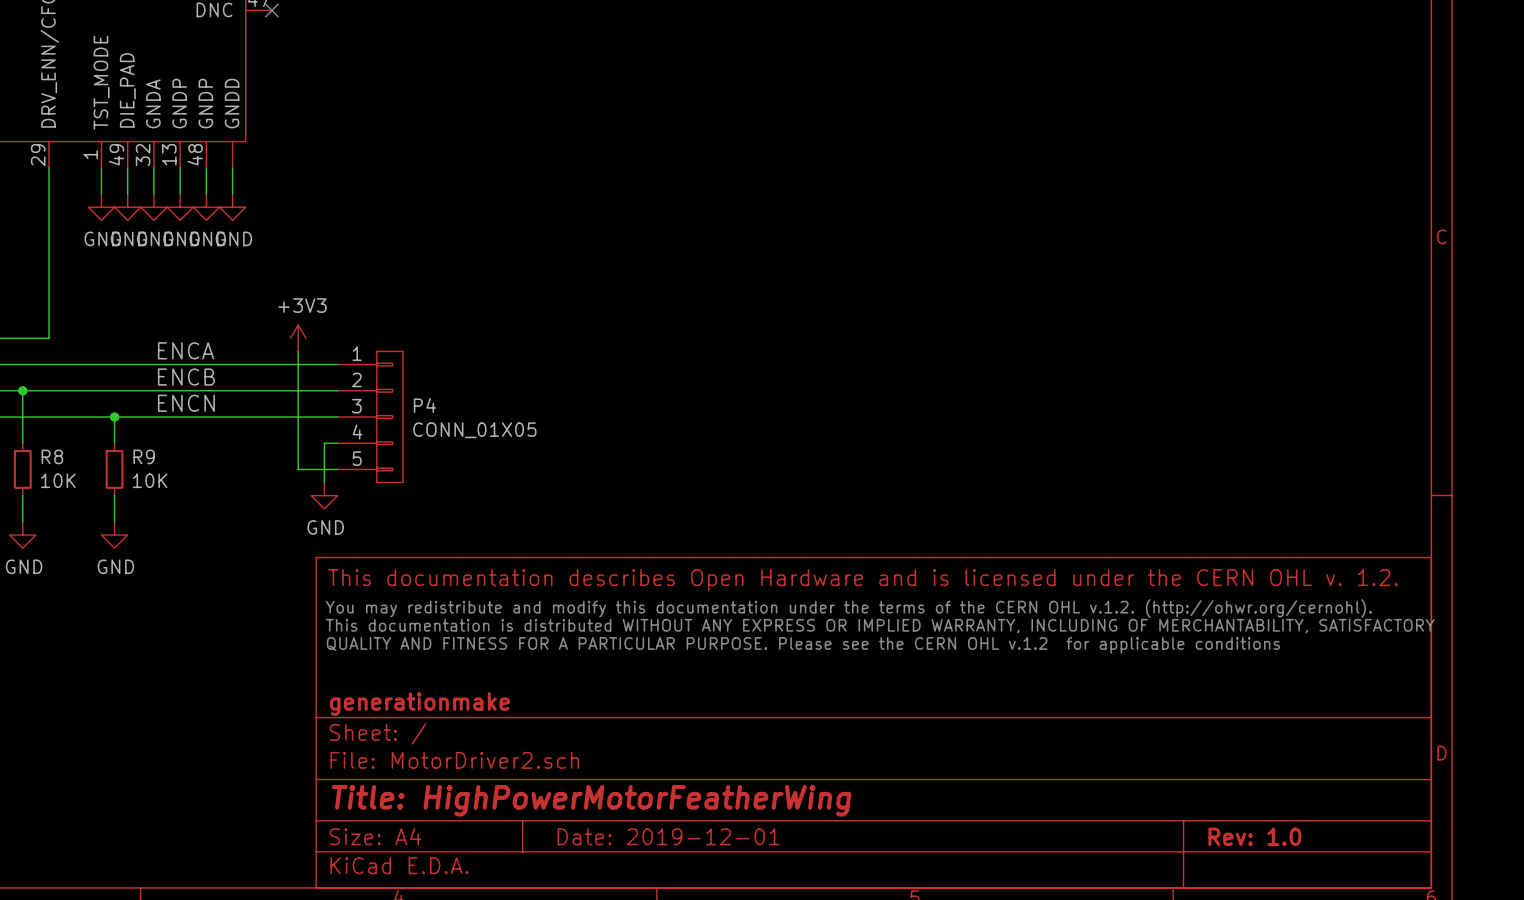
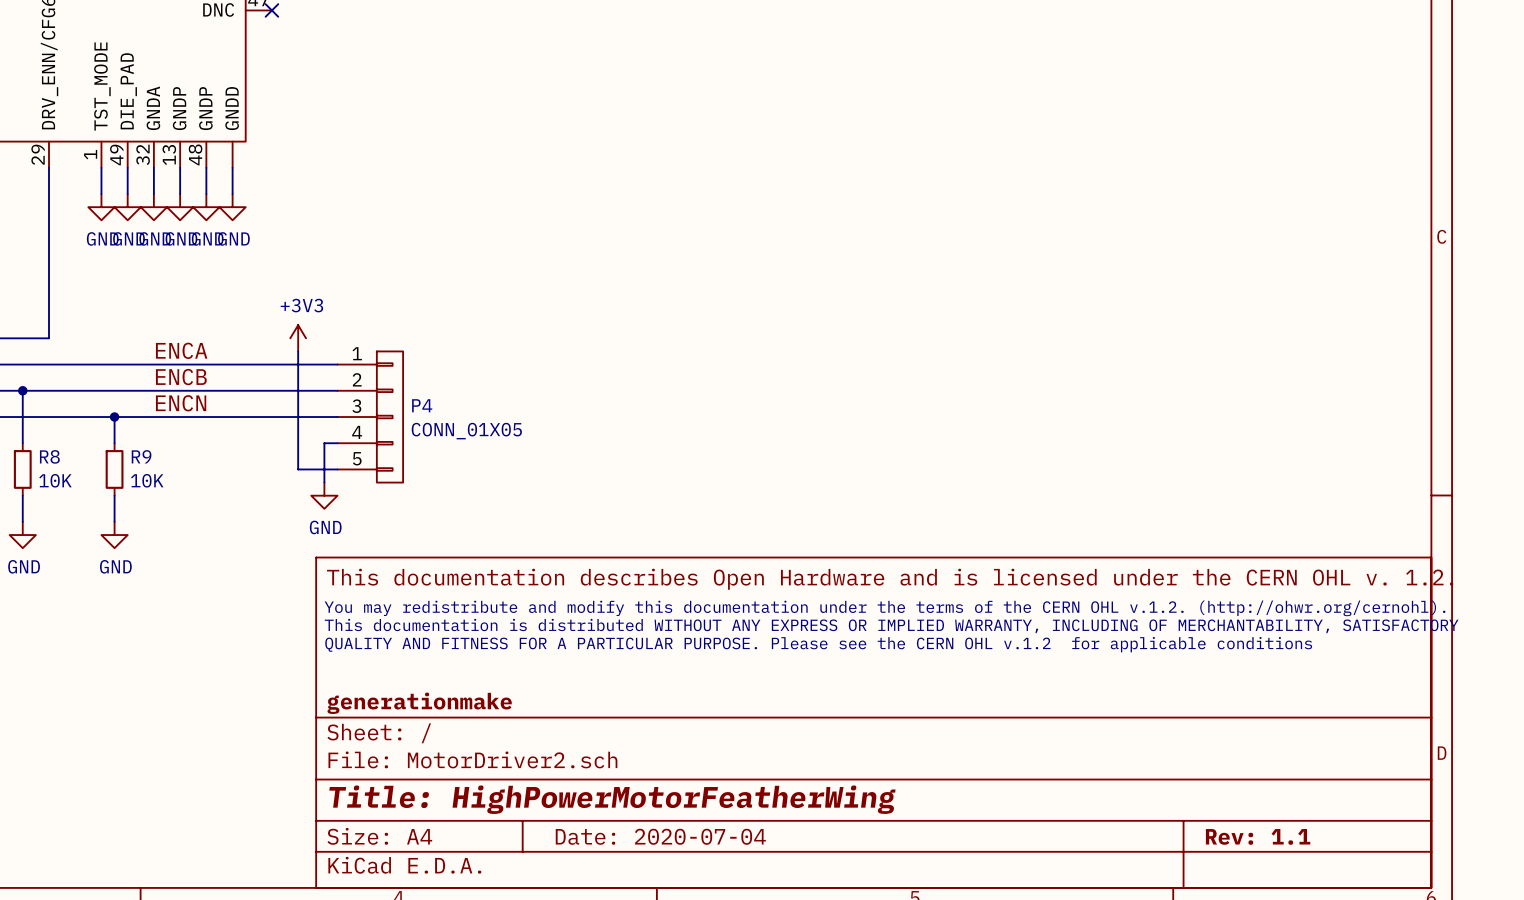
title block: Date: 2019-12-01 (668, 836) -> Date: 2020-07-04 (660, 836)
title block: Rev: 1.0 (1254, 836) -> Rev: 1.1 (1258, 836)

